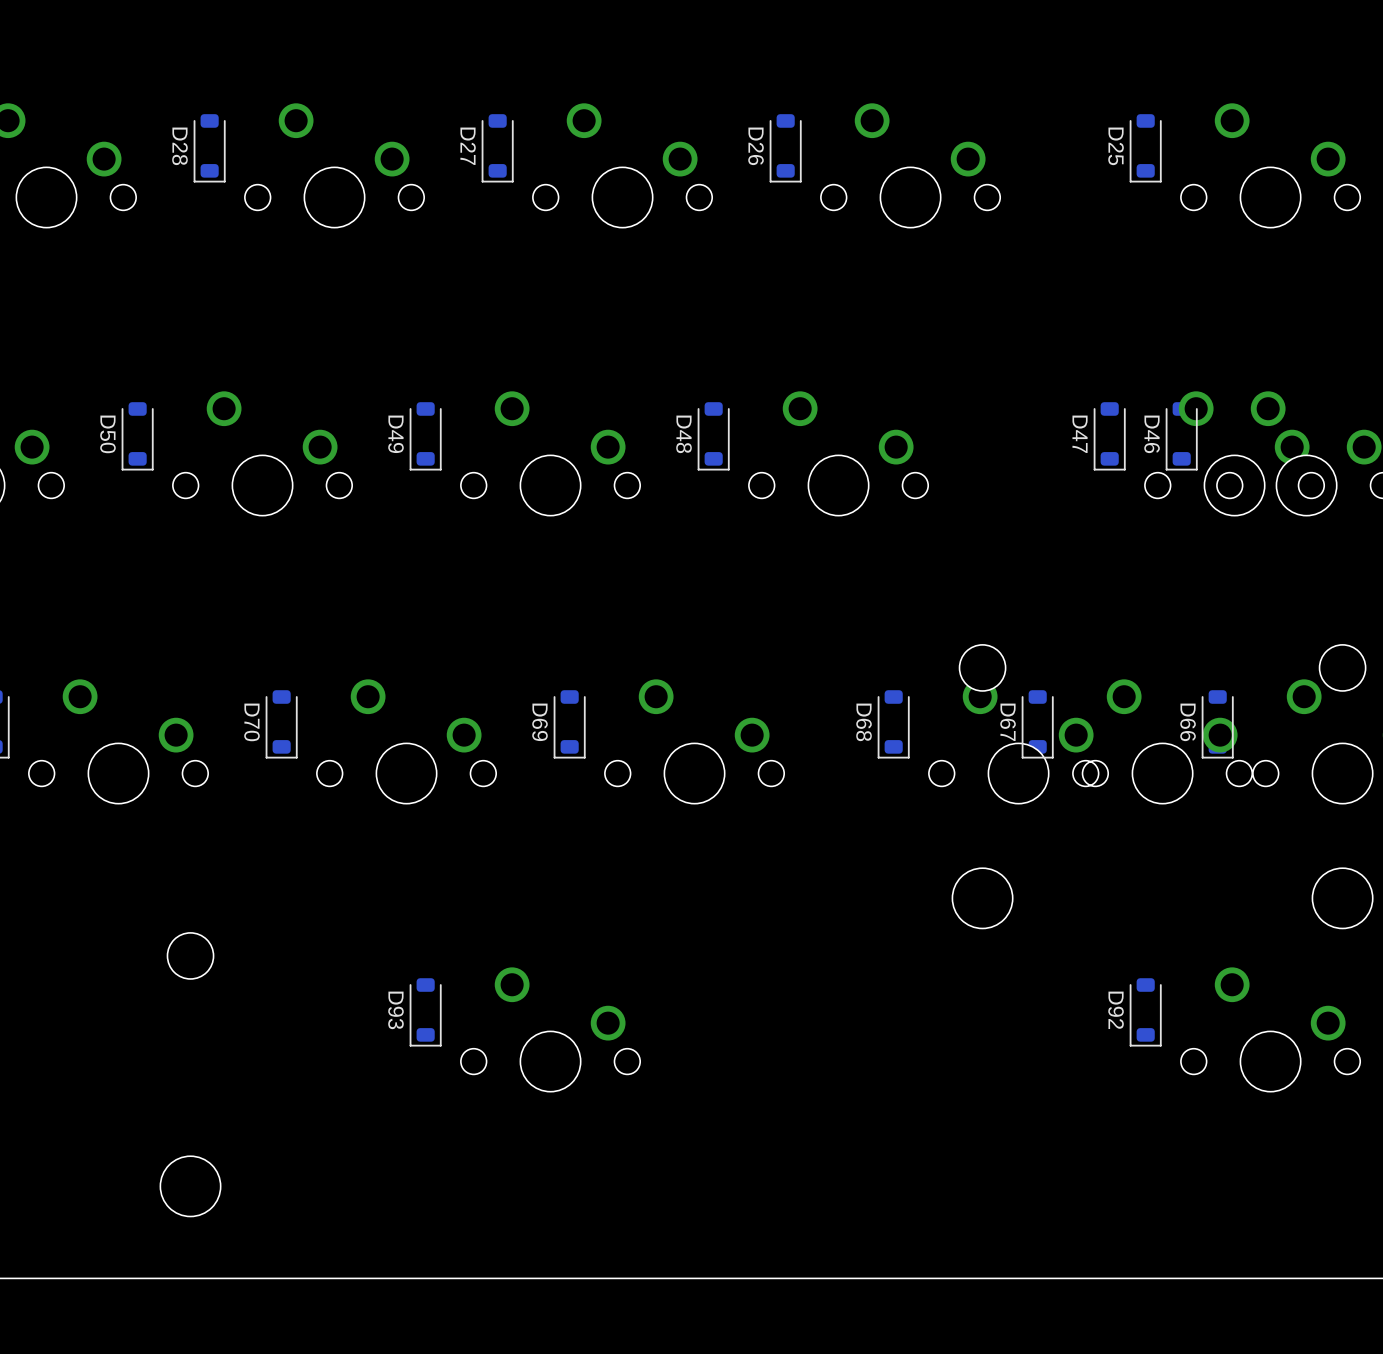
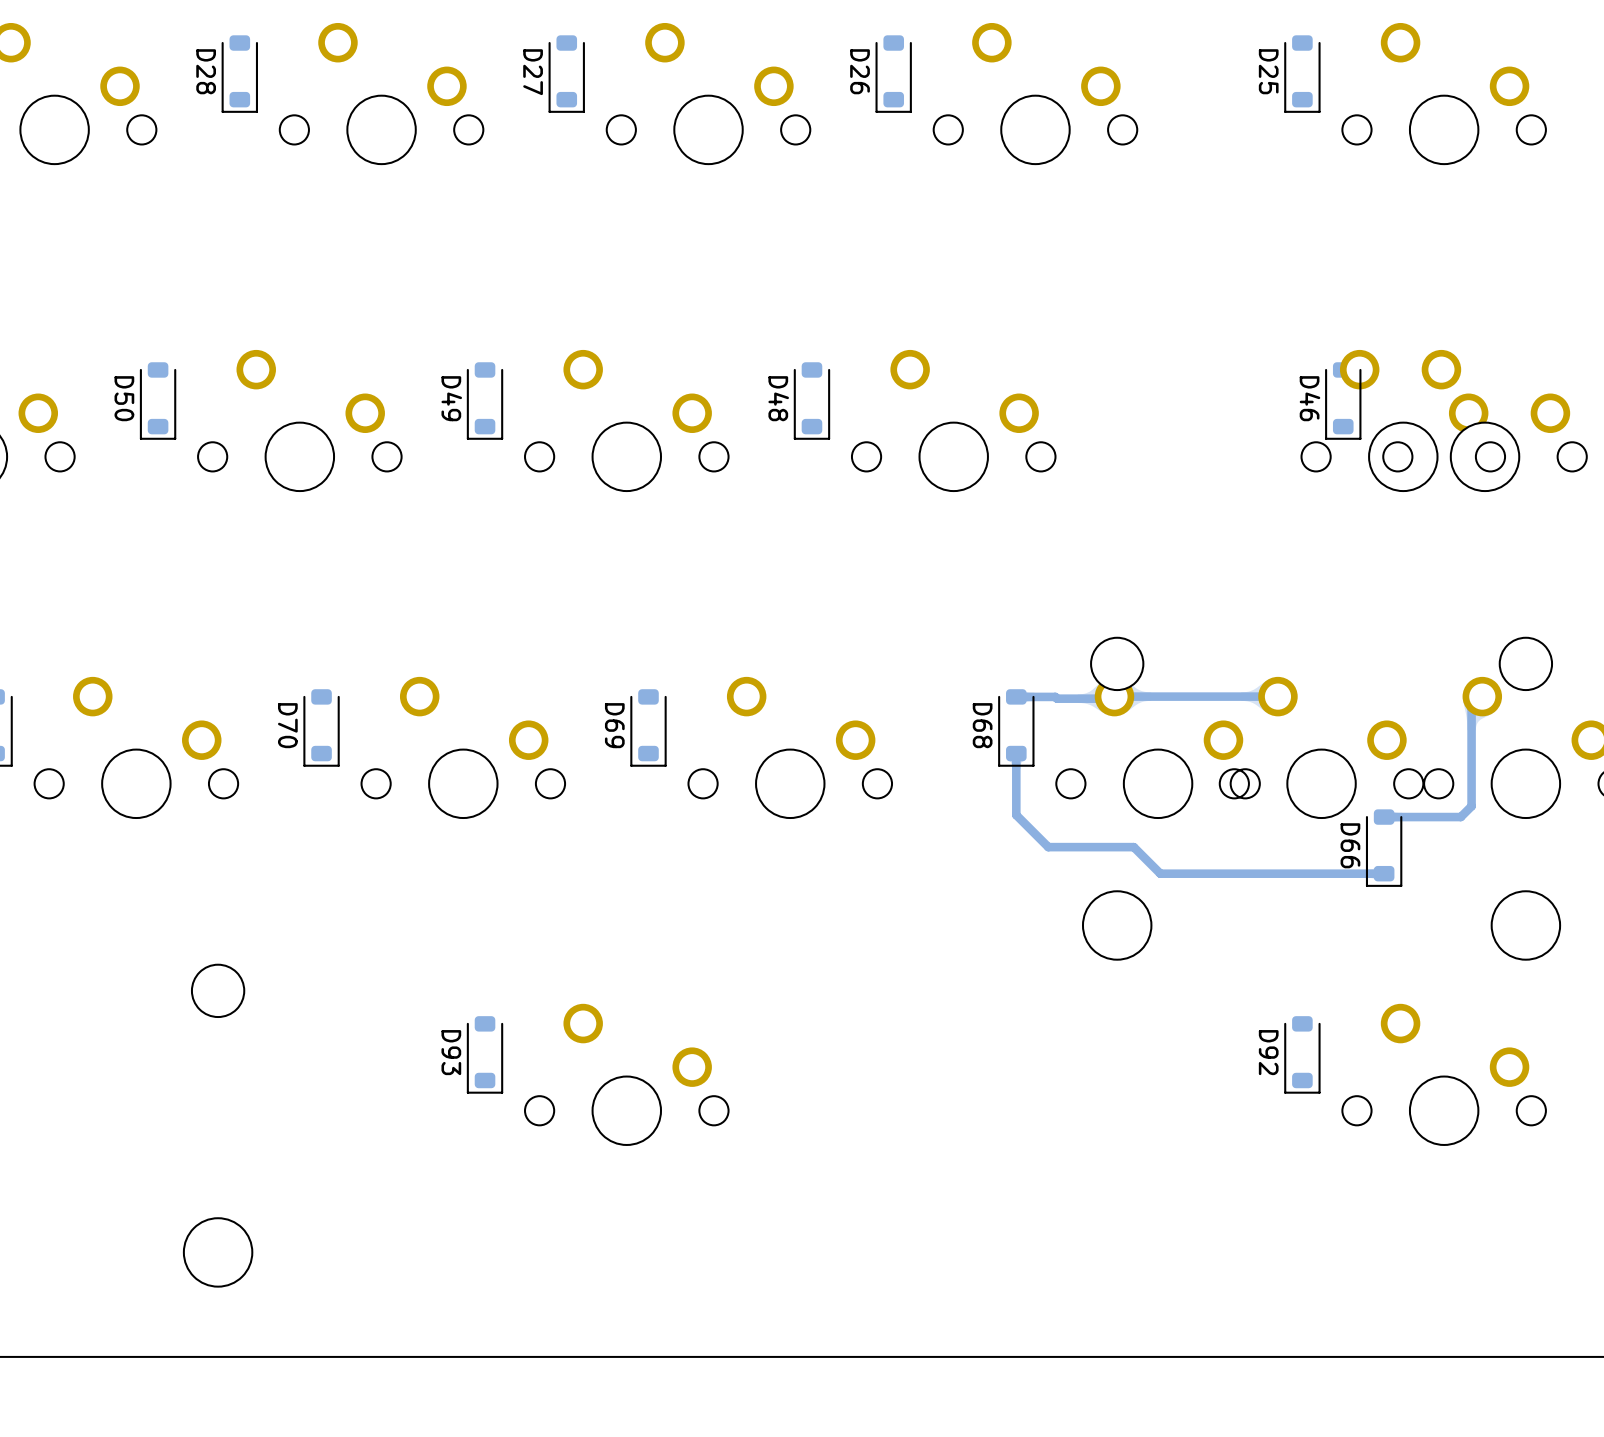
D47: (1109, 436) -> none
track: none -> (1016, 696) (1114, 698)
track: none -> (1114, 696) (1277, 696) (1275, 698)
track: none -> (1482, 696) (1471, 707) (1471, 806) (1460, 817) (1384, 817)
D67: (1037, 724) -> none
D66 position: (1217, 724) -> (1384, 848)
track: none -> (1016, 753) (1016, 815) (1048, 847) (1133, 847) (1160, 873) (1384, 873)

